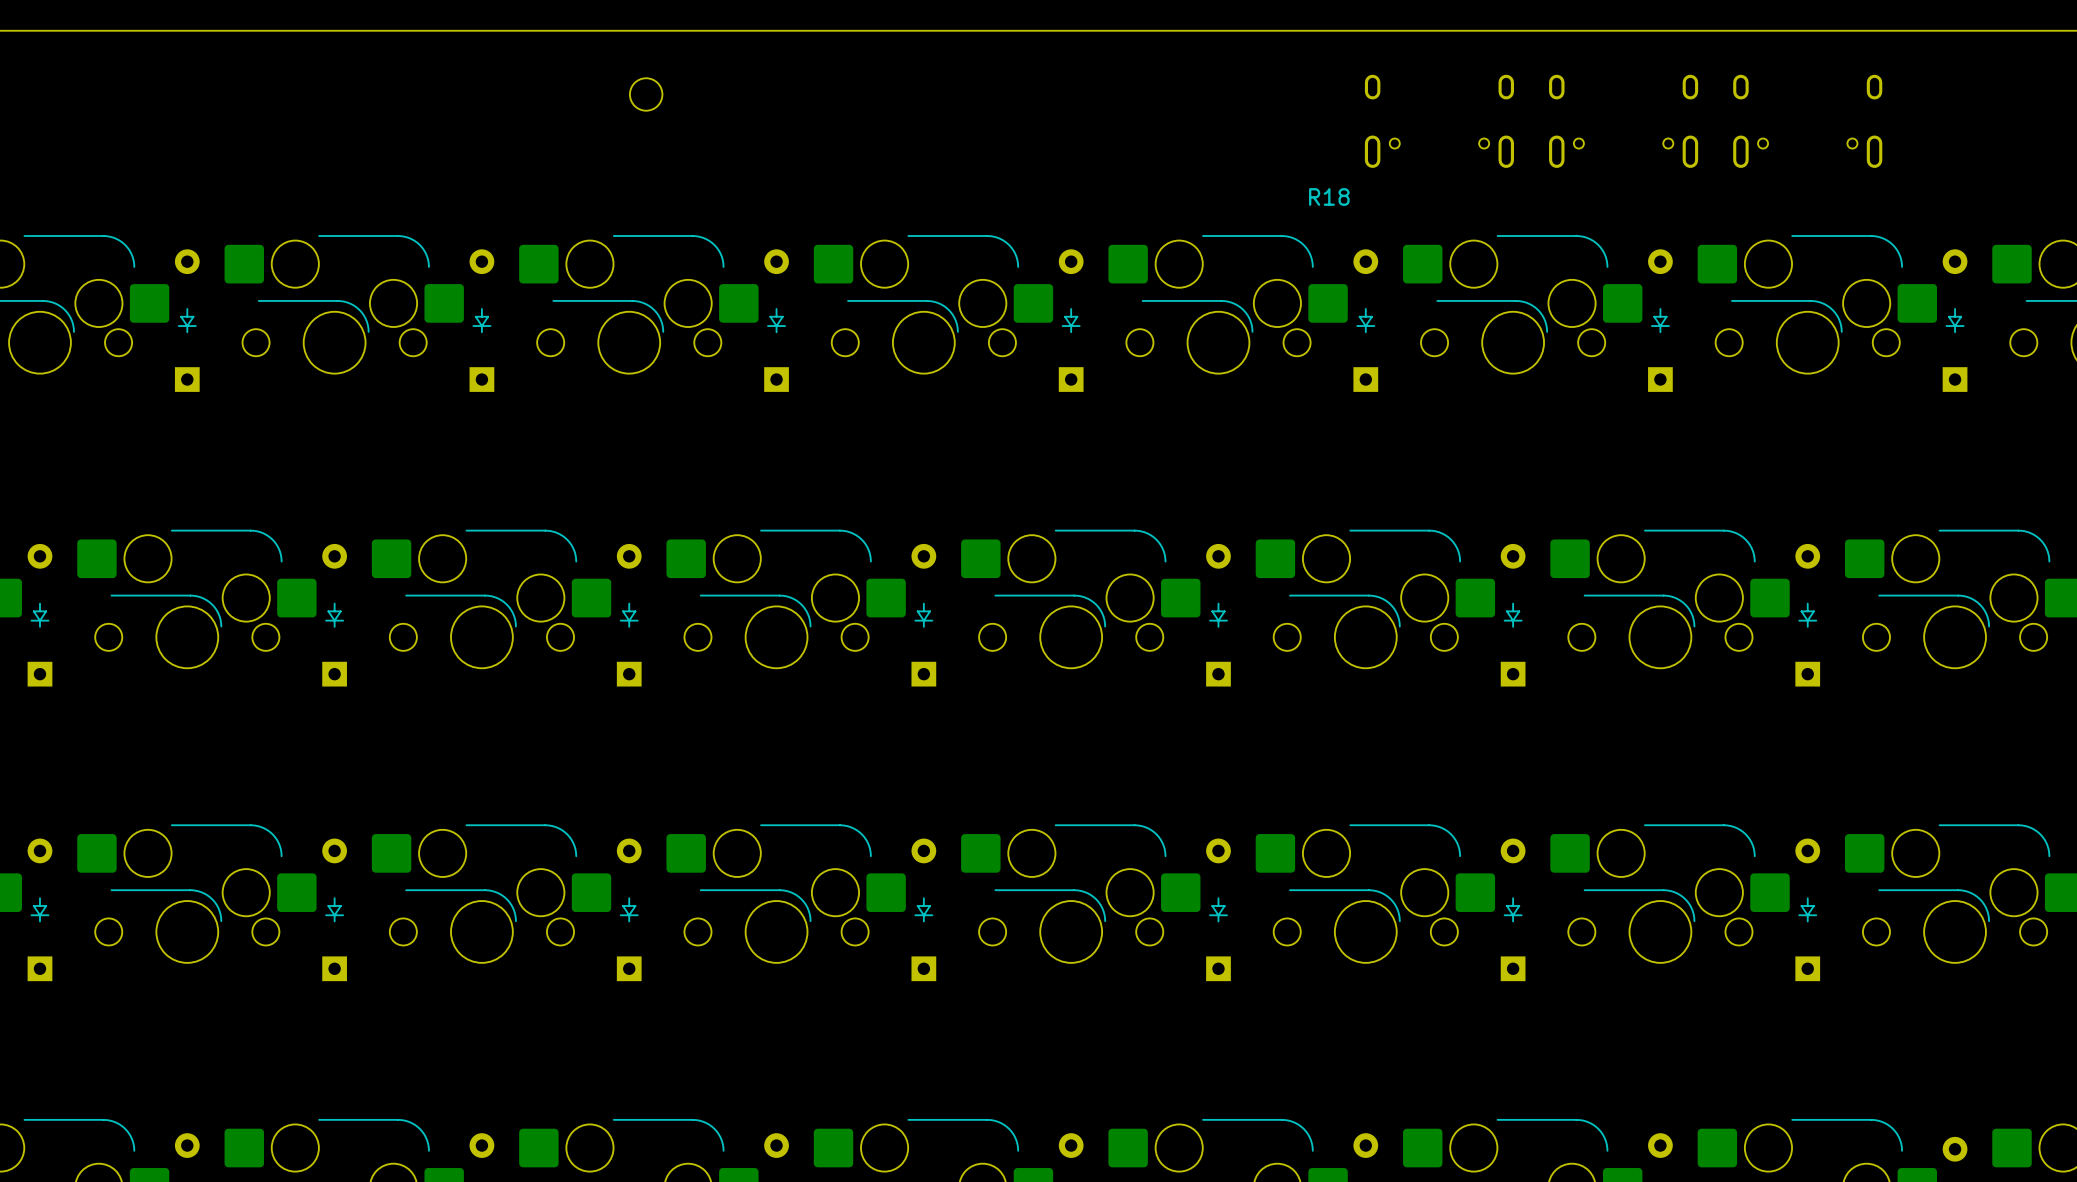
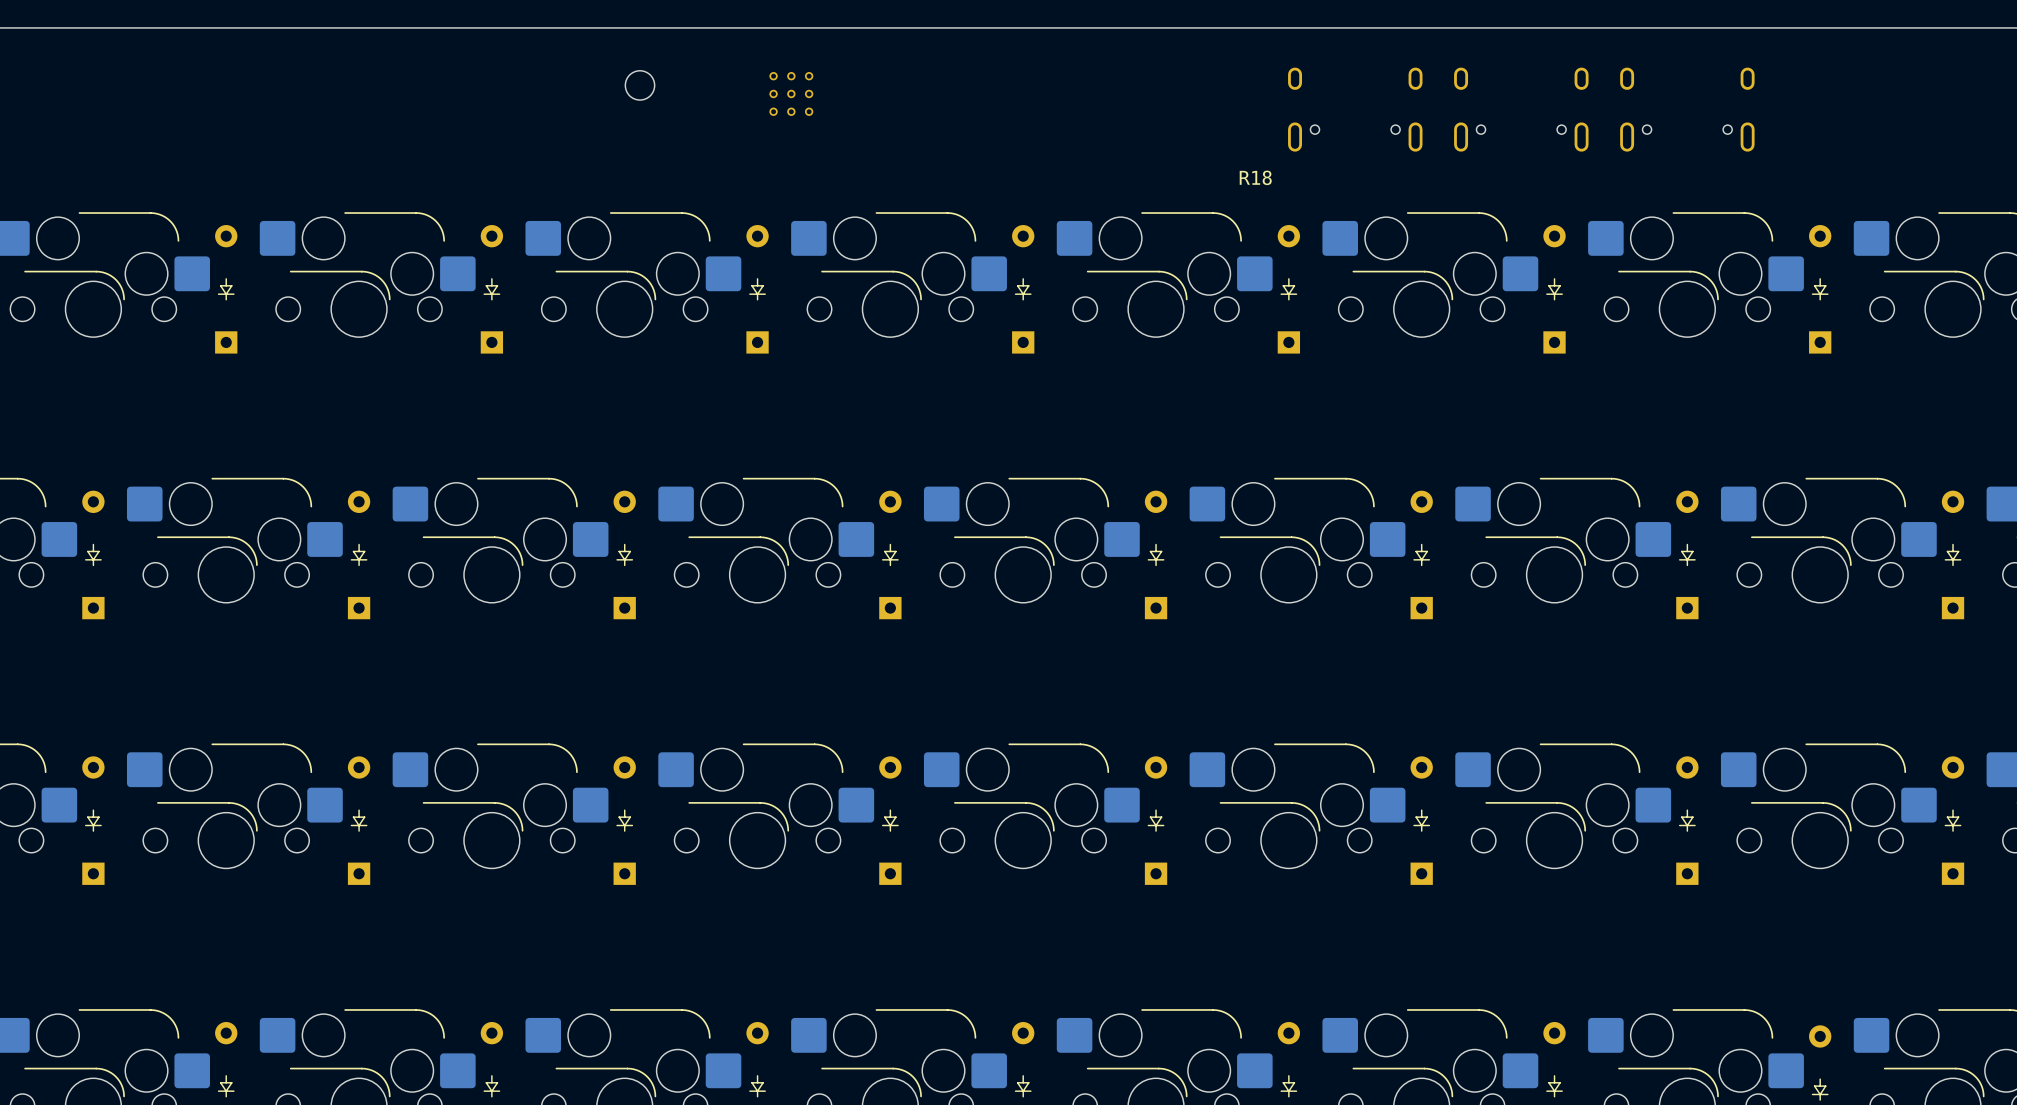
part: none -> (791, 93)

